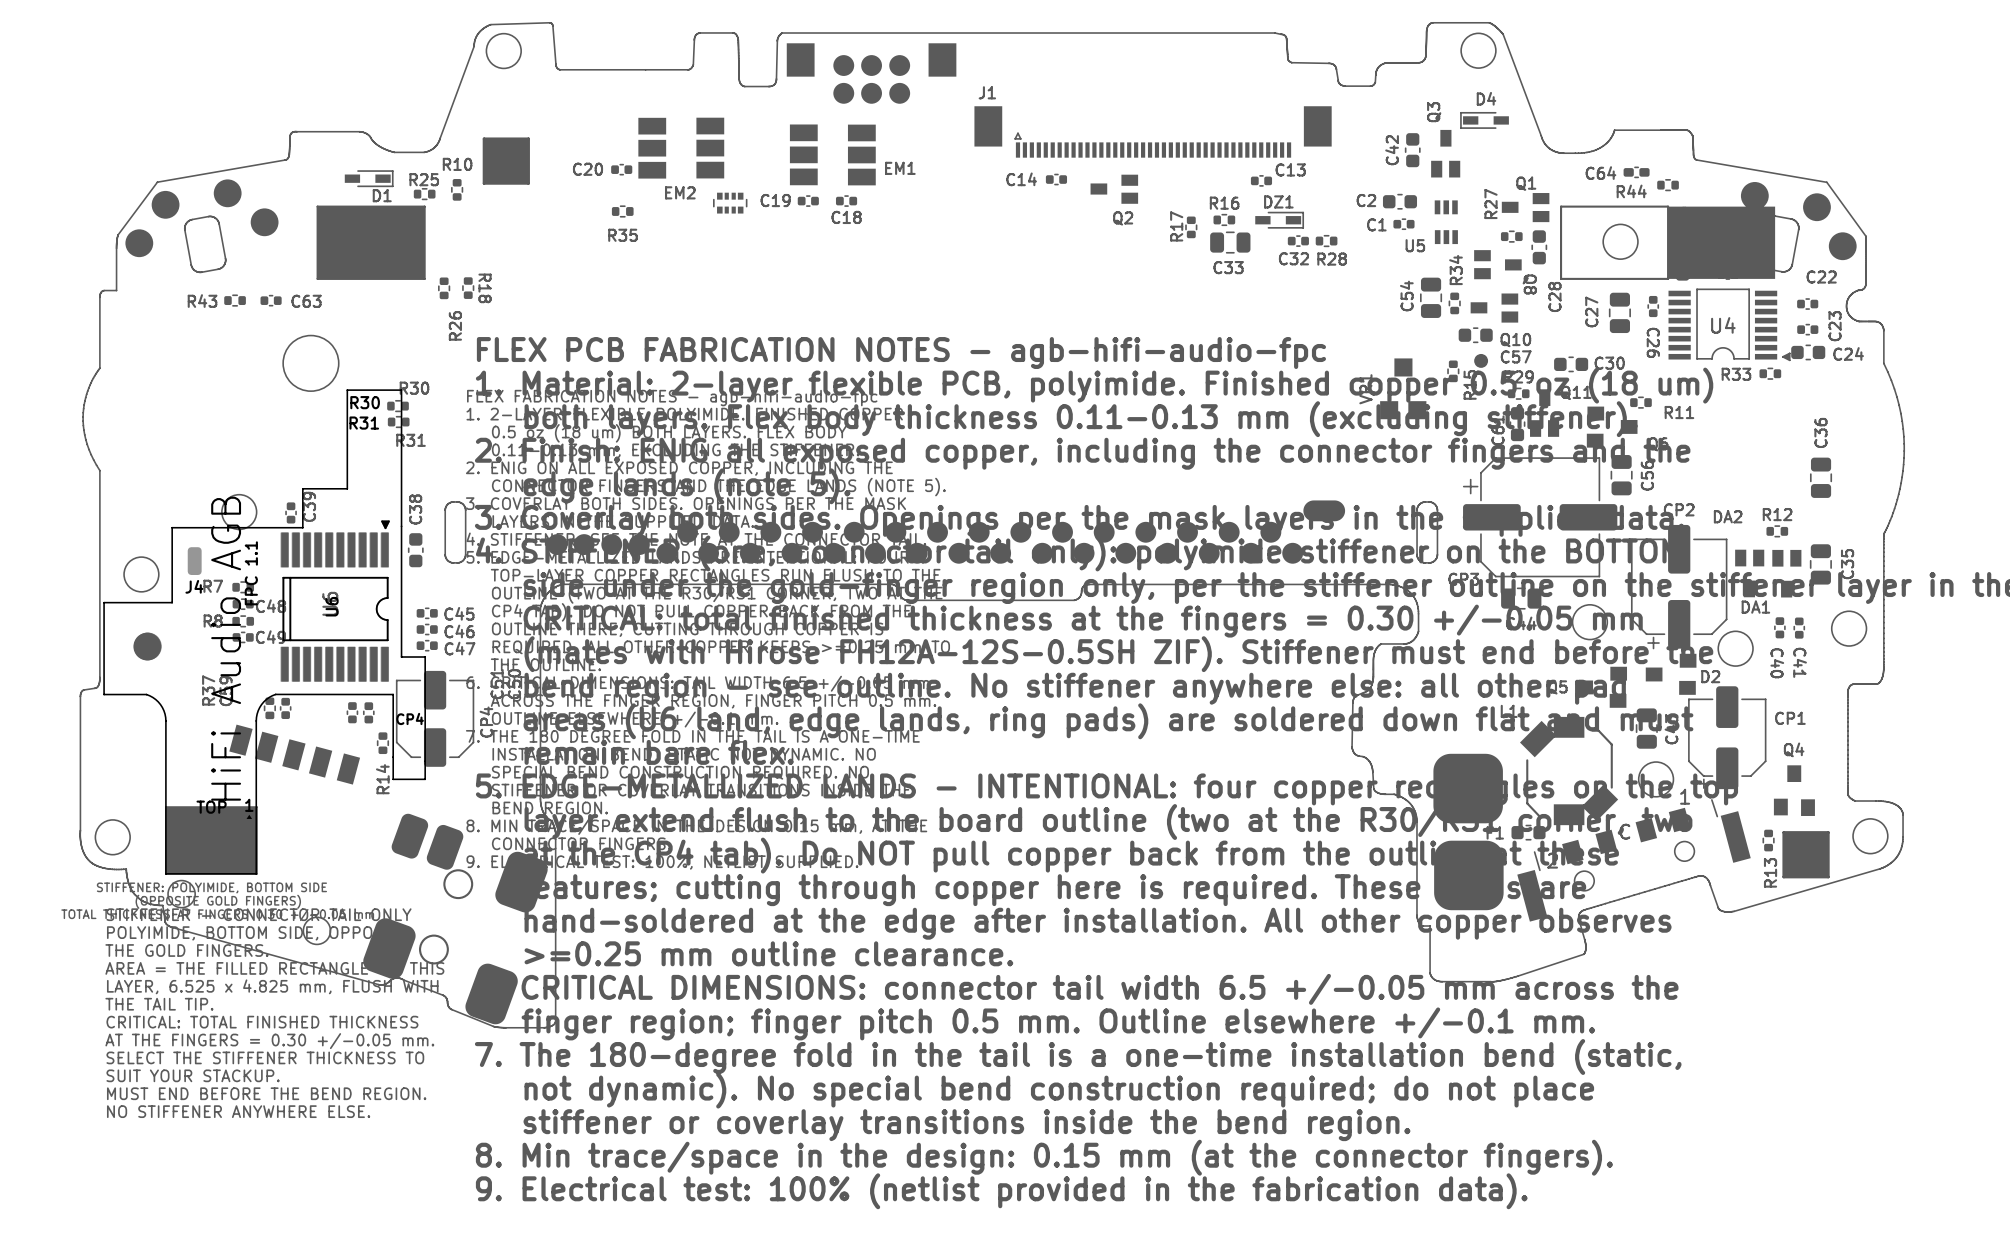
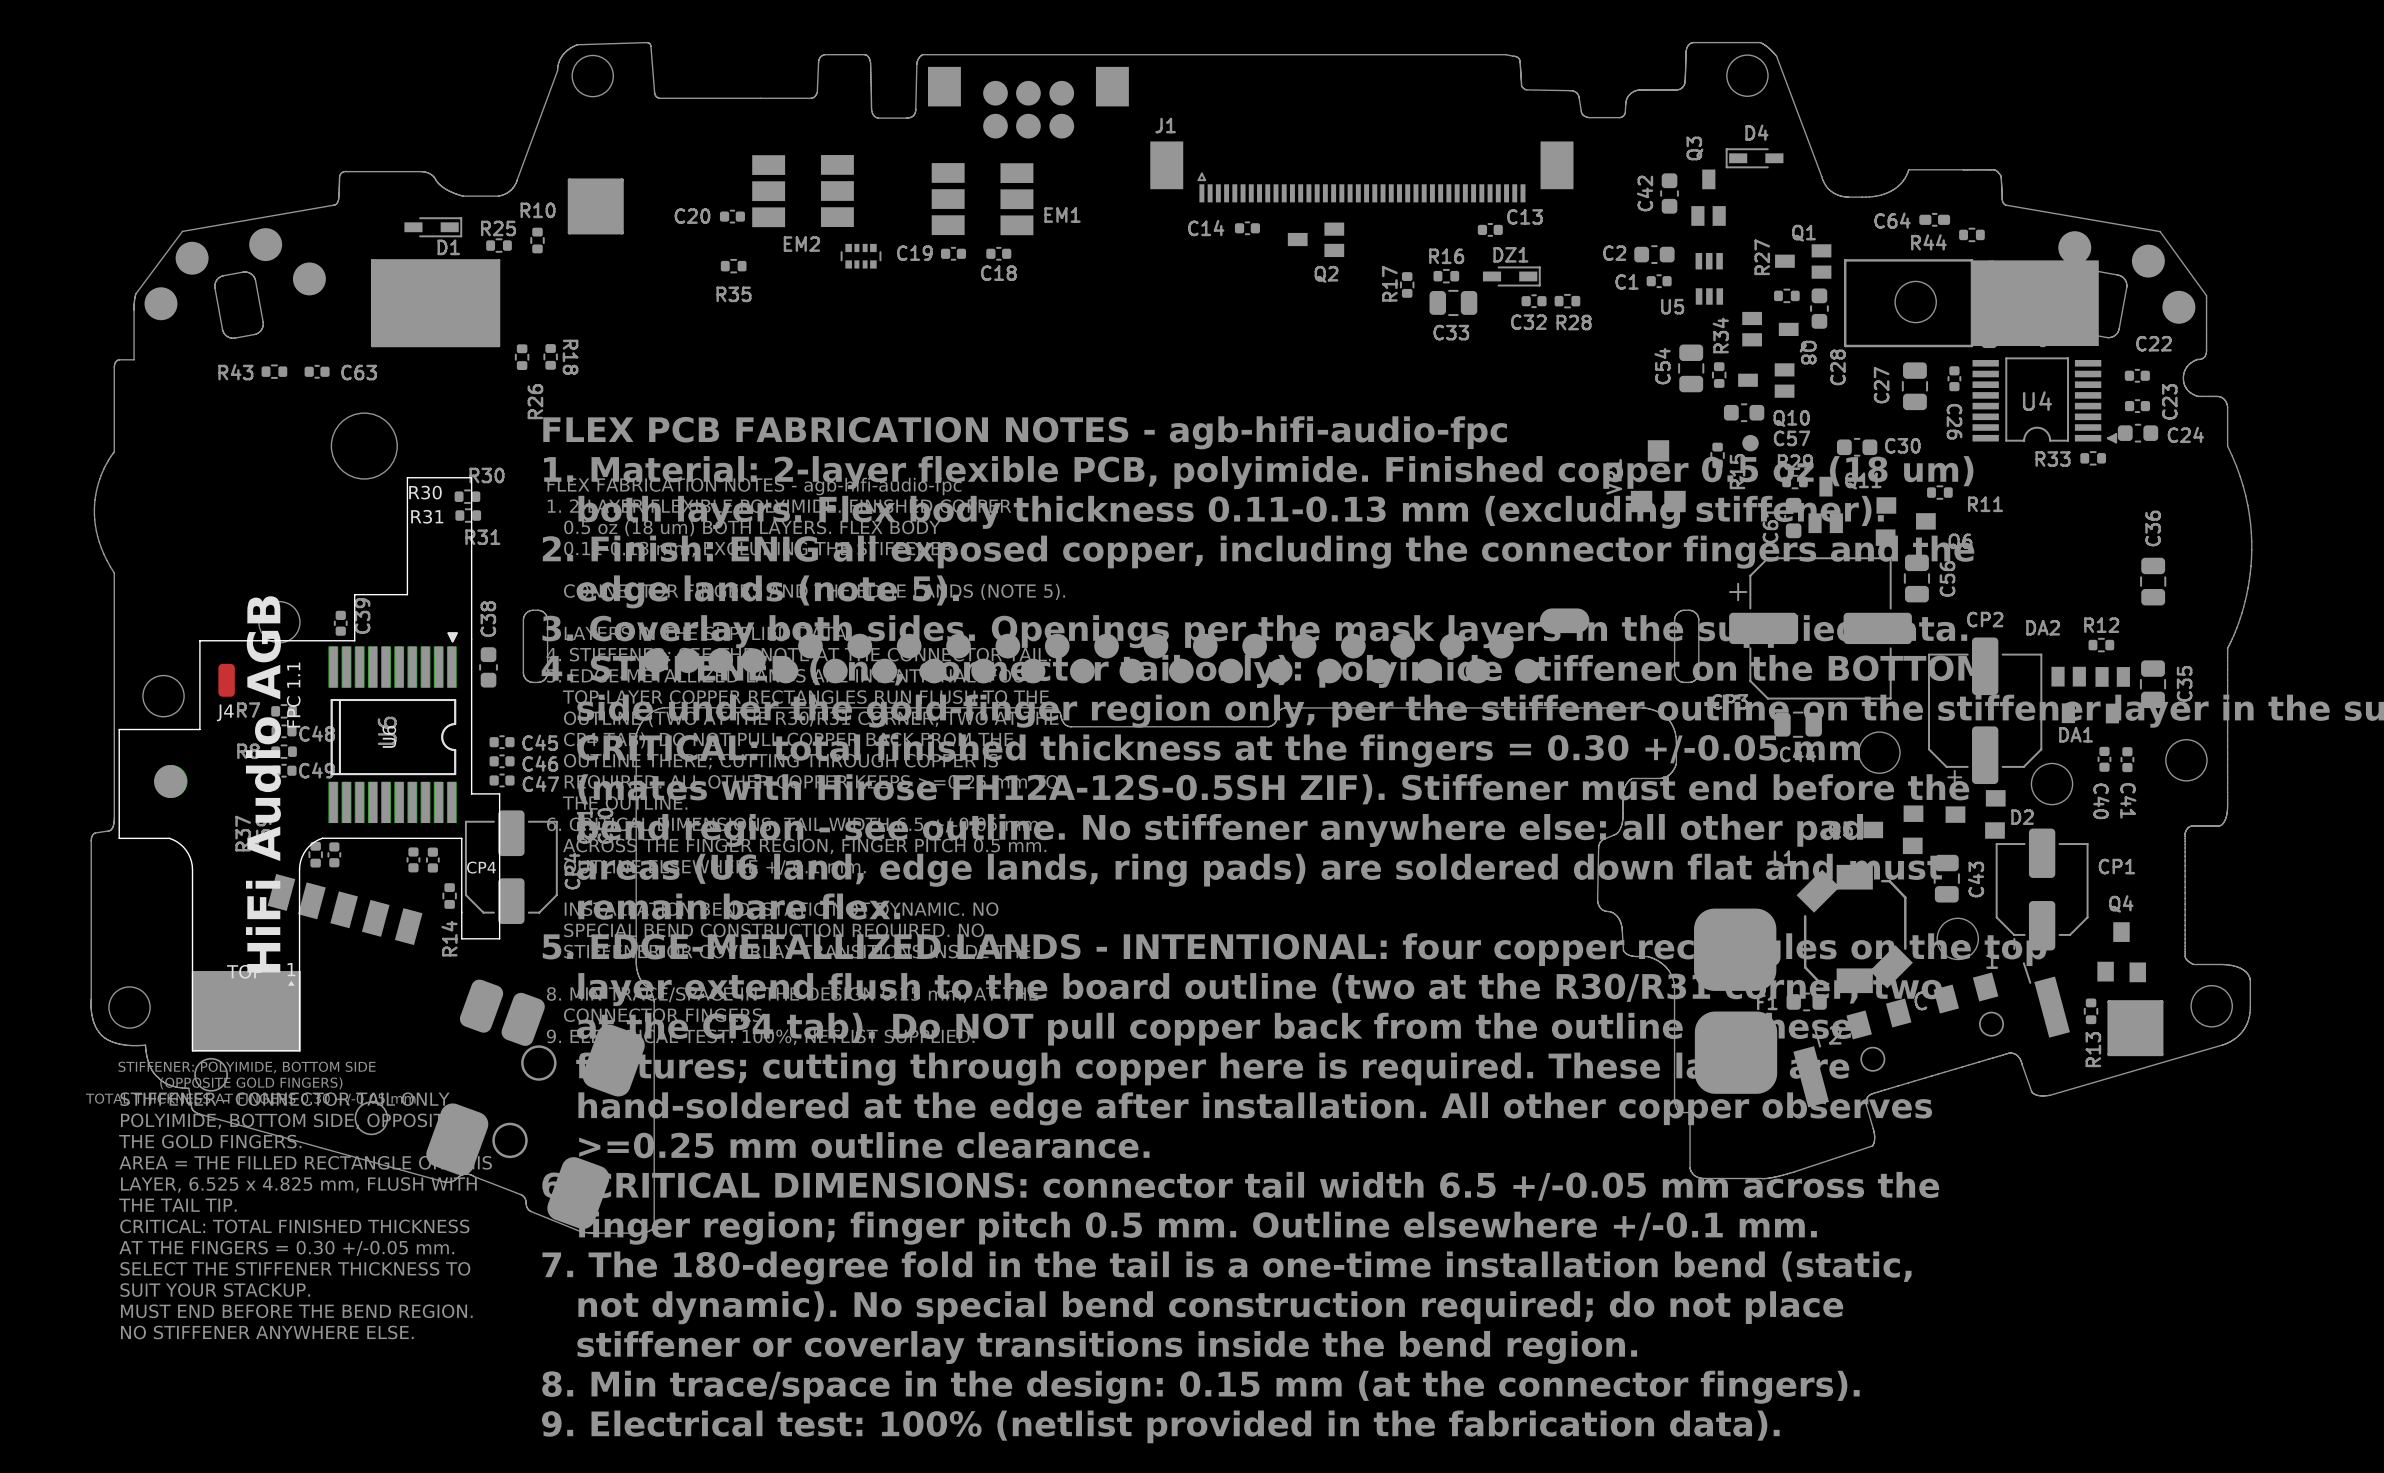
text: 2. ENIG ON ALL EXPOSED COPPER, INCLUDING THE (679, 468) -> none
text: 3. COVERLAY BOTH SIDES. OPENINGS PER THE MASK (686, 503) -> none
text: 7. THE 180 DEGREE FOLD IN THE TAIL IS A ONE-TIME (692, 736) -> none
text: BEND REGION. (550, 807) -> none

